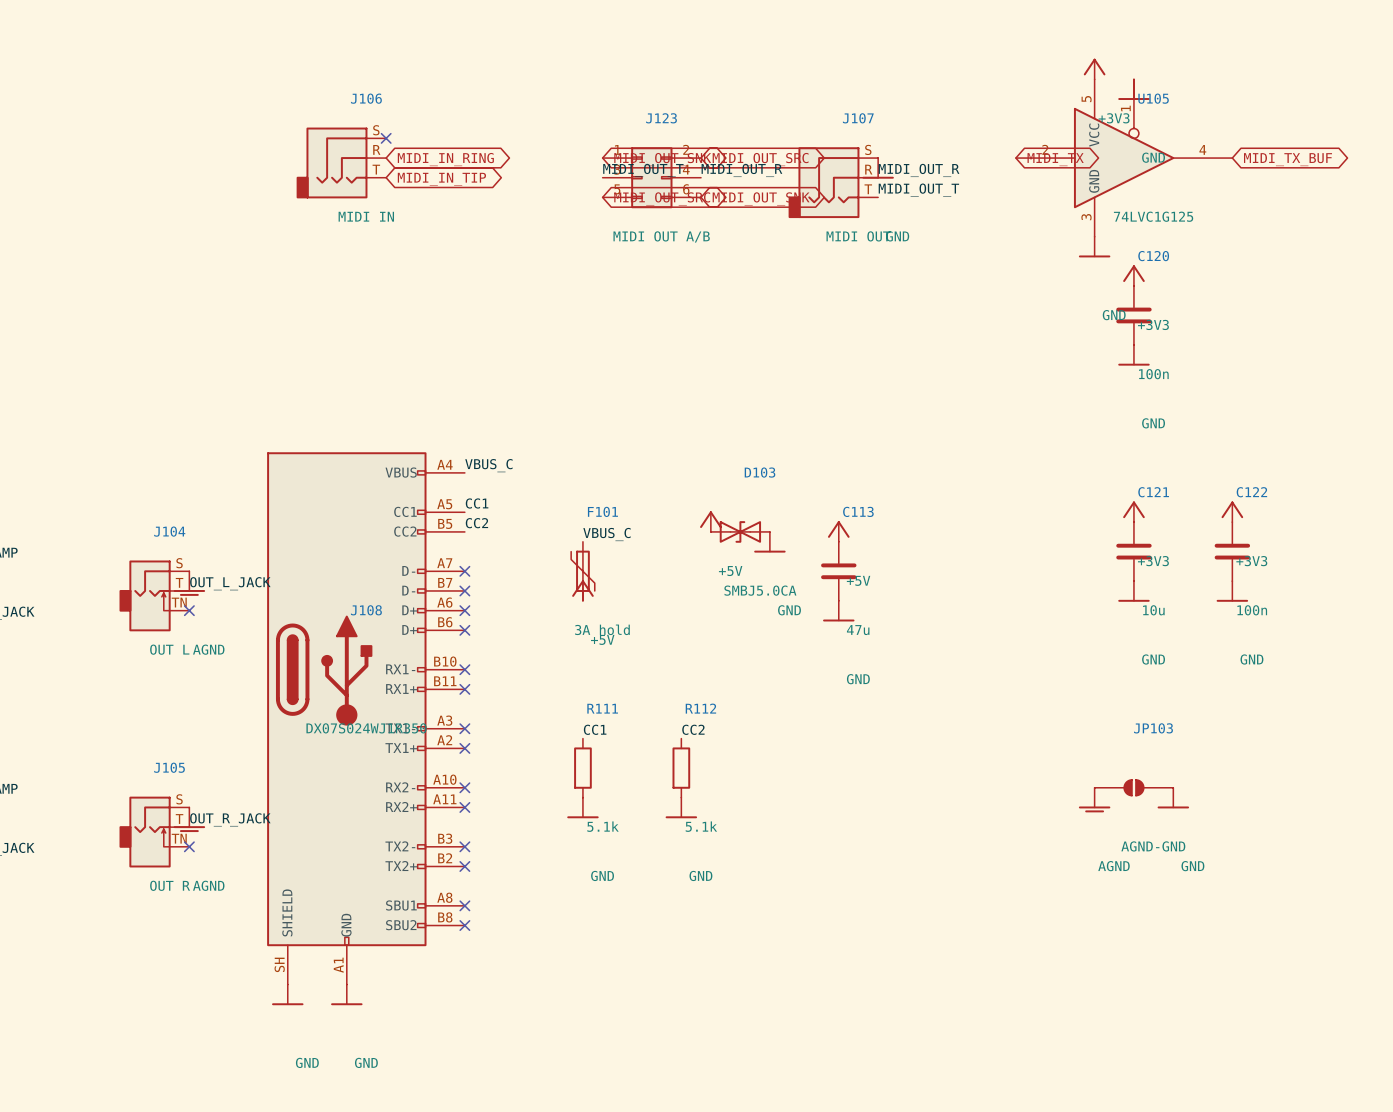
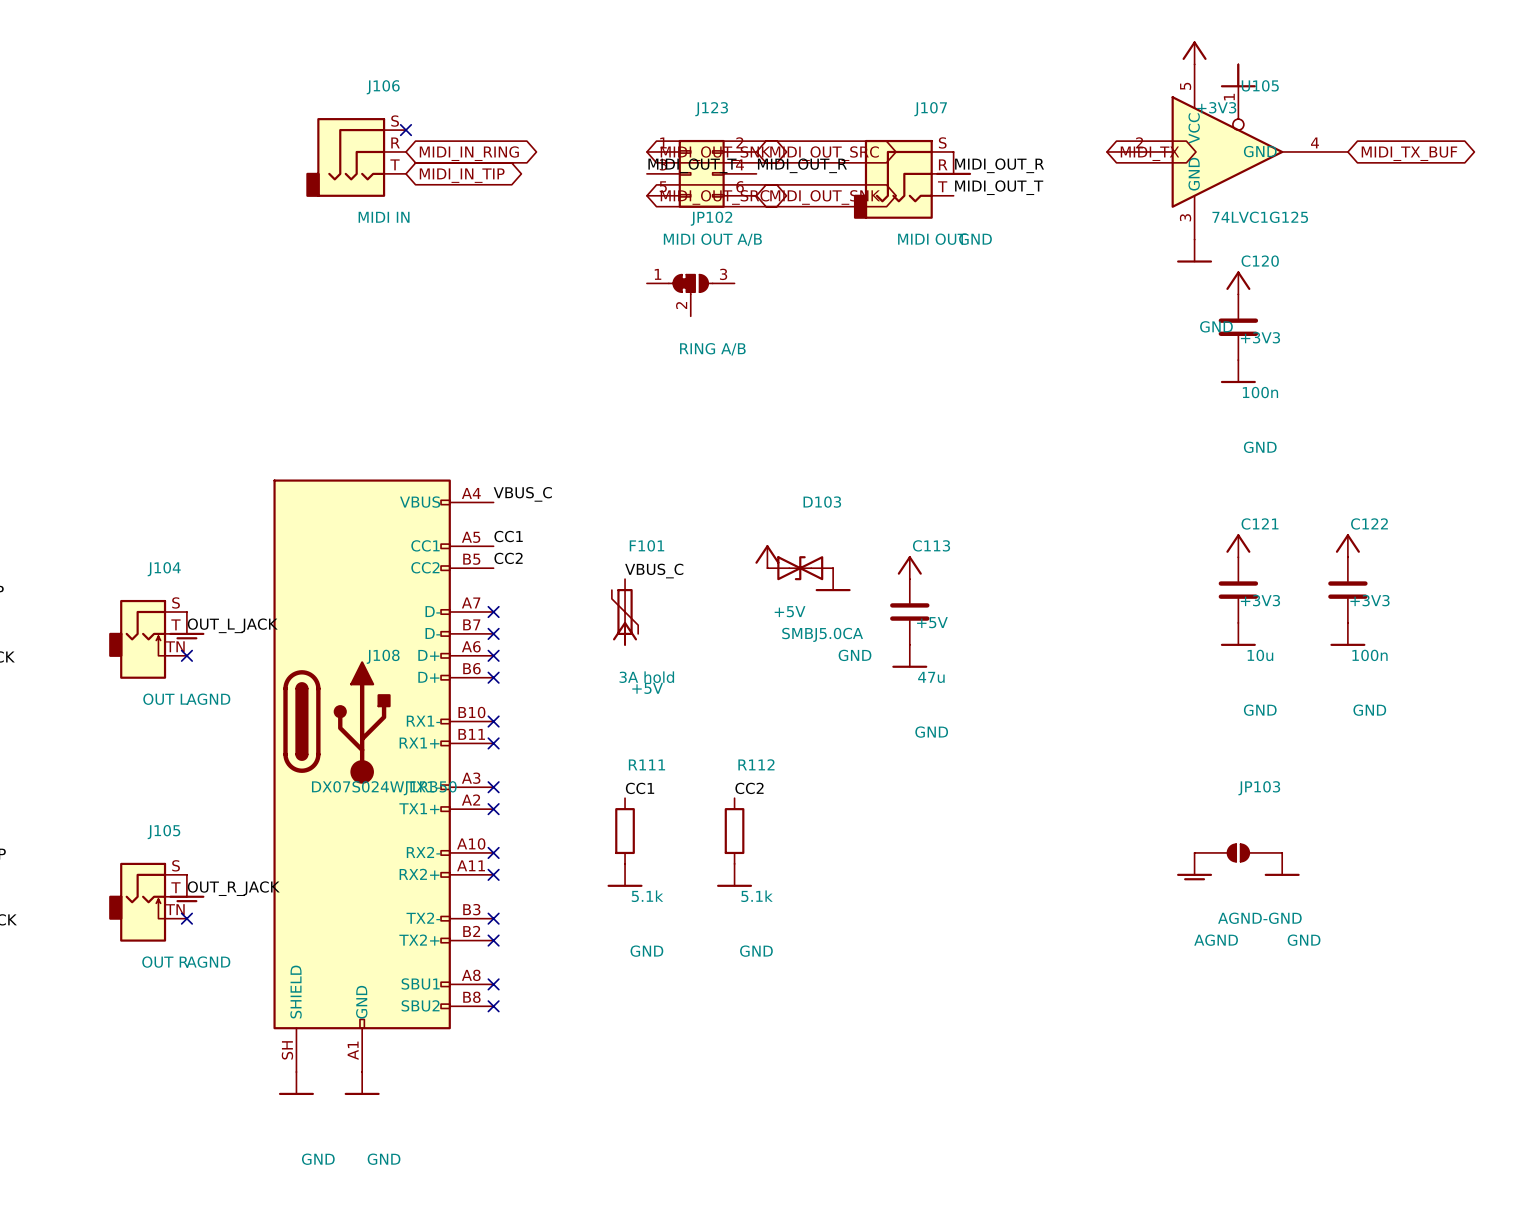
JP102: none -> RING A/B (690, 295)

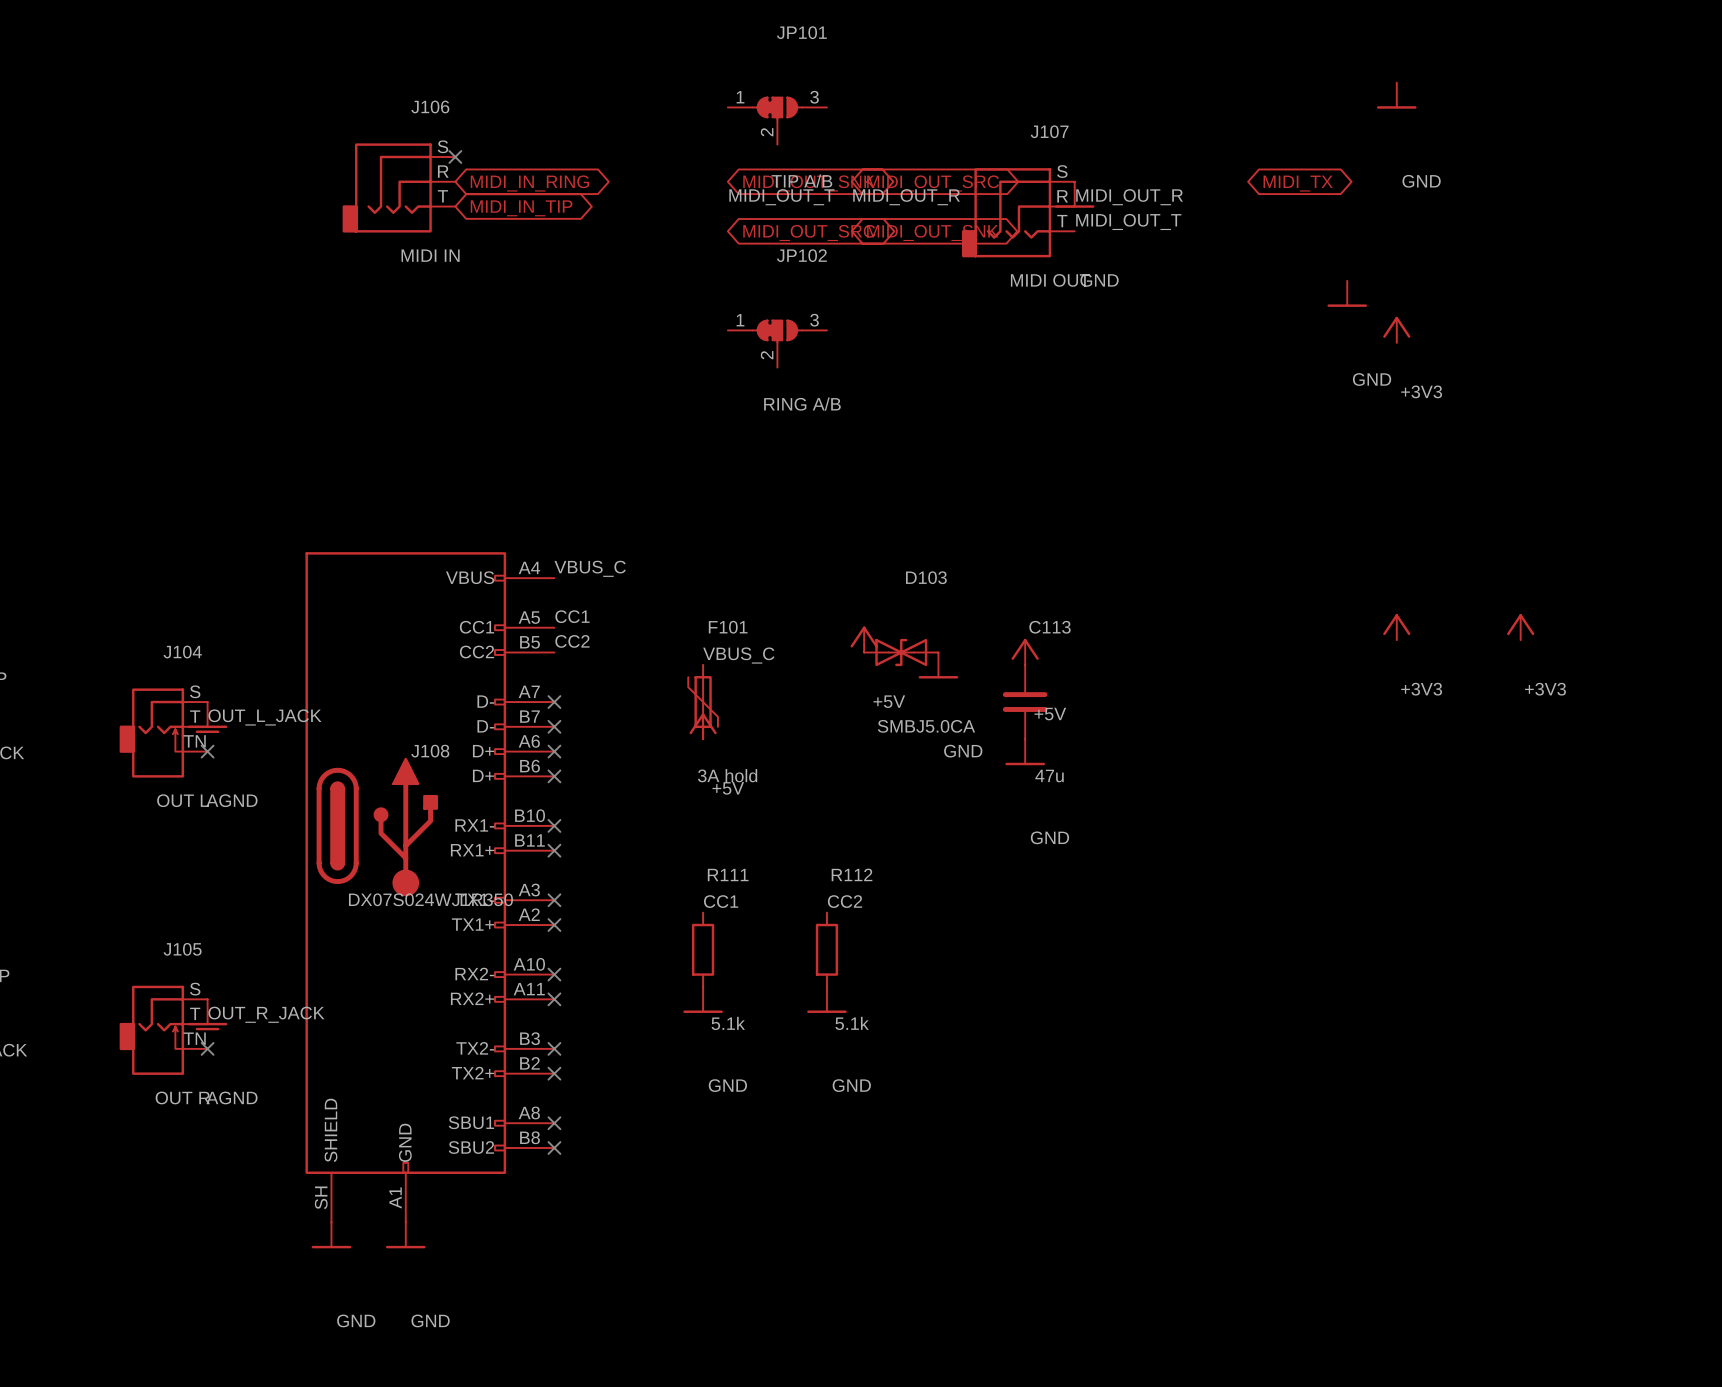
power symbol: +3V3 (1194, 52) -> none
JP101: none -> TIP A/B (777, 121)
U105: 74LVC1G125 (1227, 151) -> none
global label: MIDI_TX_BUF (1409, 153) -> none
J123: MIDI OUT A/B (701, 173) -> none
C120: 100n (1238, 327) -> none
power symbol: GND (1238, 371) -> none
C121: 10u (1238, 590) -> none
C122: 100n (1347, 590) -> none
power symbol: GND (1238, 634) -> none
power symbol: GND (1347, 634) -> none
JP103: AGND-GND (1238, 852) -> none
power symbol: GND (1282, 864) -> none
power symbol: AGND (1194, 866) -> none

